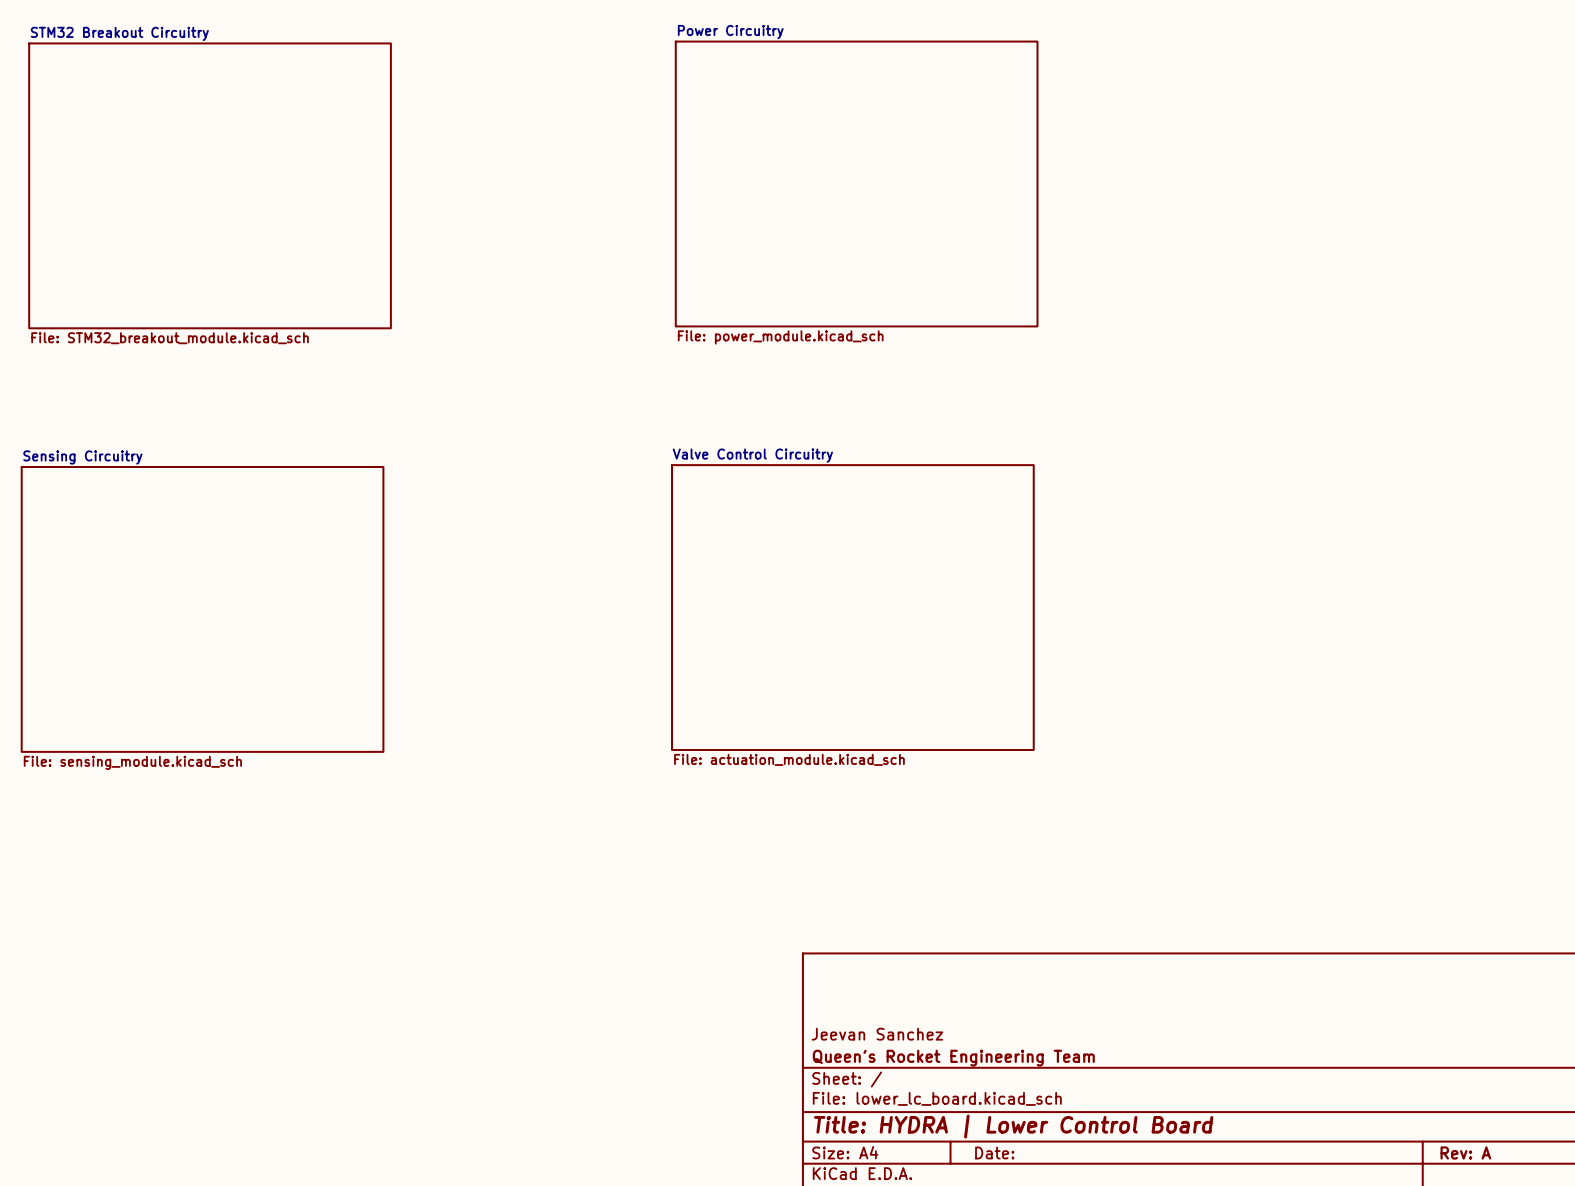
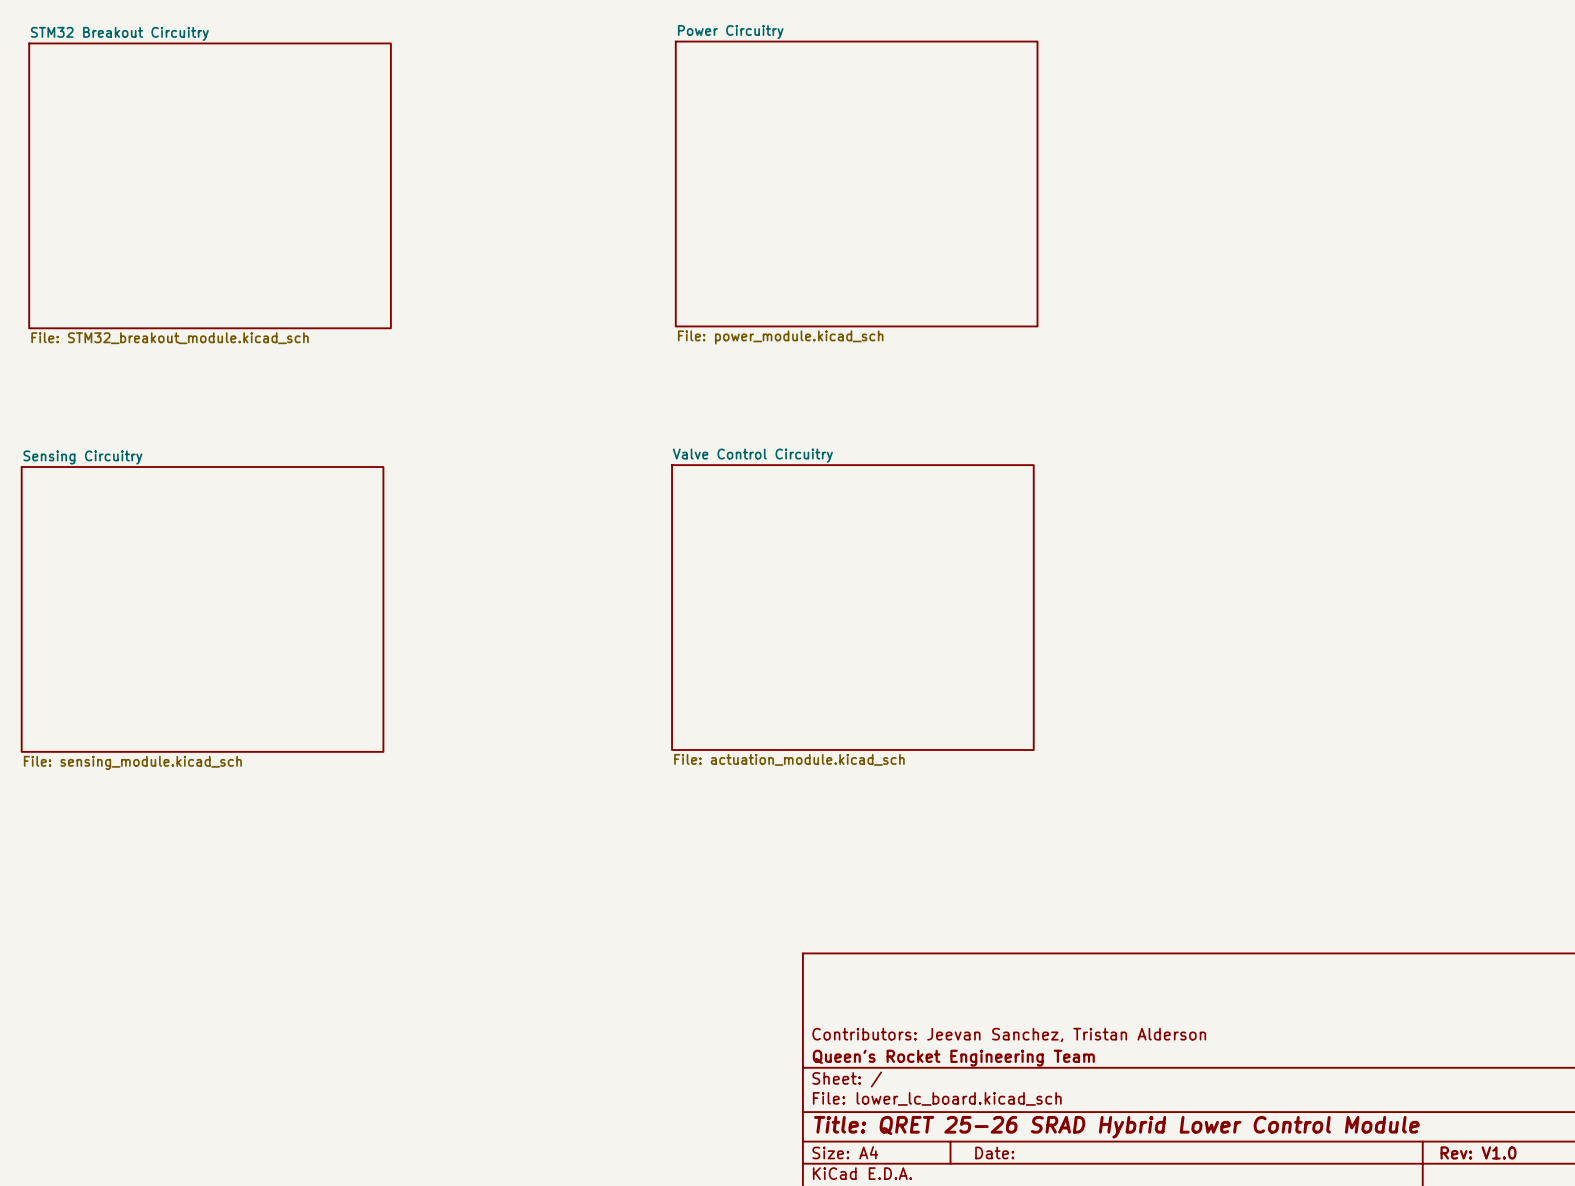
title block: Jeevan Sanchez (877, 1034) -> Contributors: Jeevan Sanchez, Tristan Alderson (1009, 1034)
title block: Title: HYDRA | Lower Control Board (1013, 1126) -> Title: QRET 25-26 SRAD Hybrid Lower Control Module (1116, 1127)
title block: Rev: A (1465, 1152) -> Rev: V1.0 (1478, 1152)

